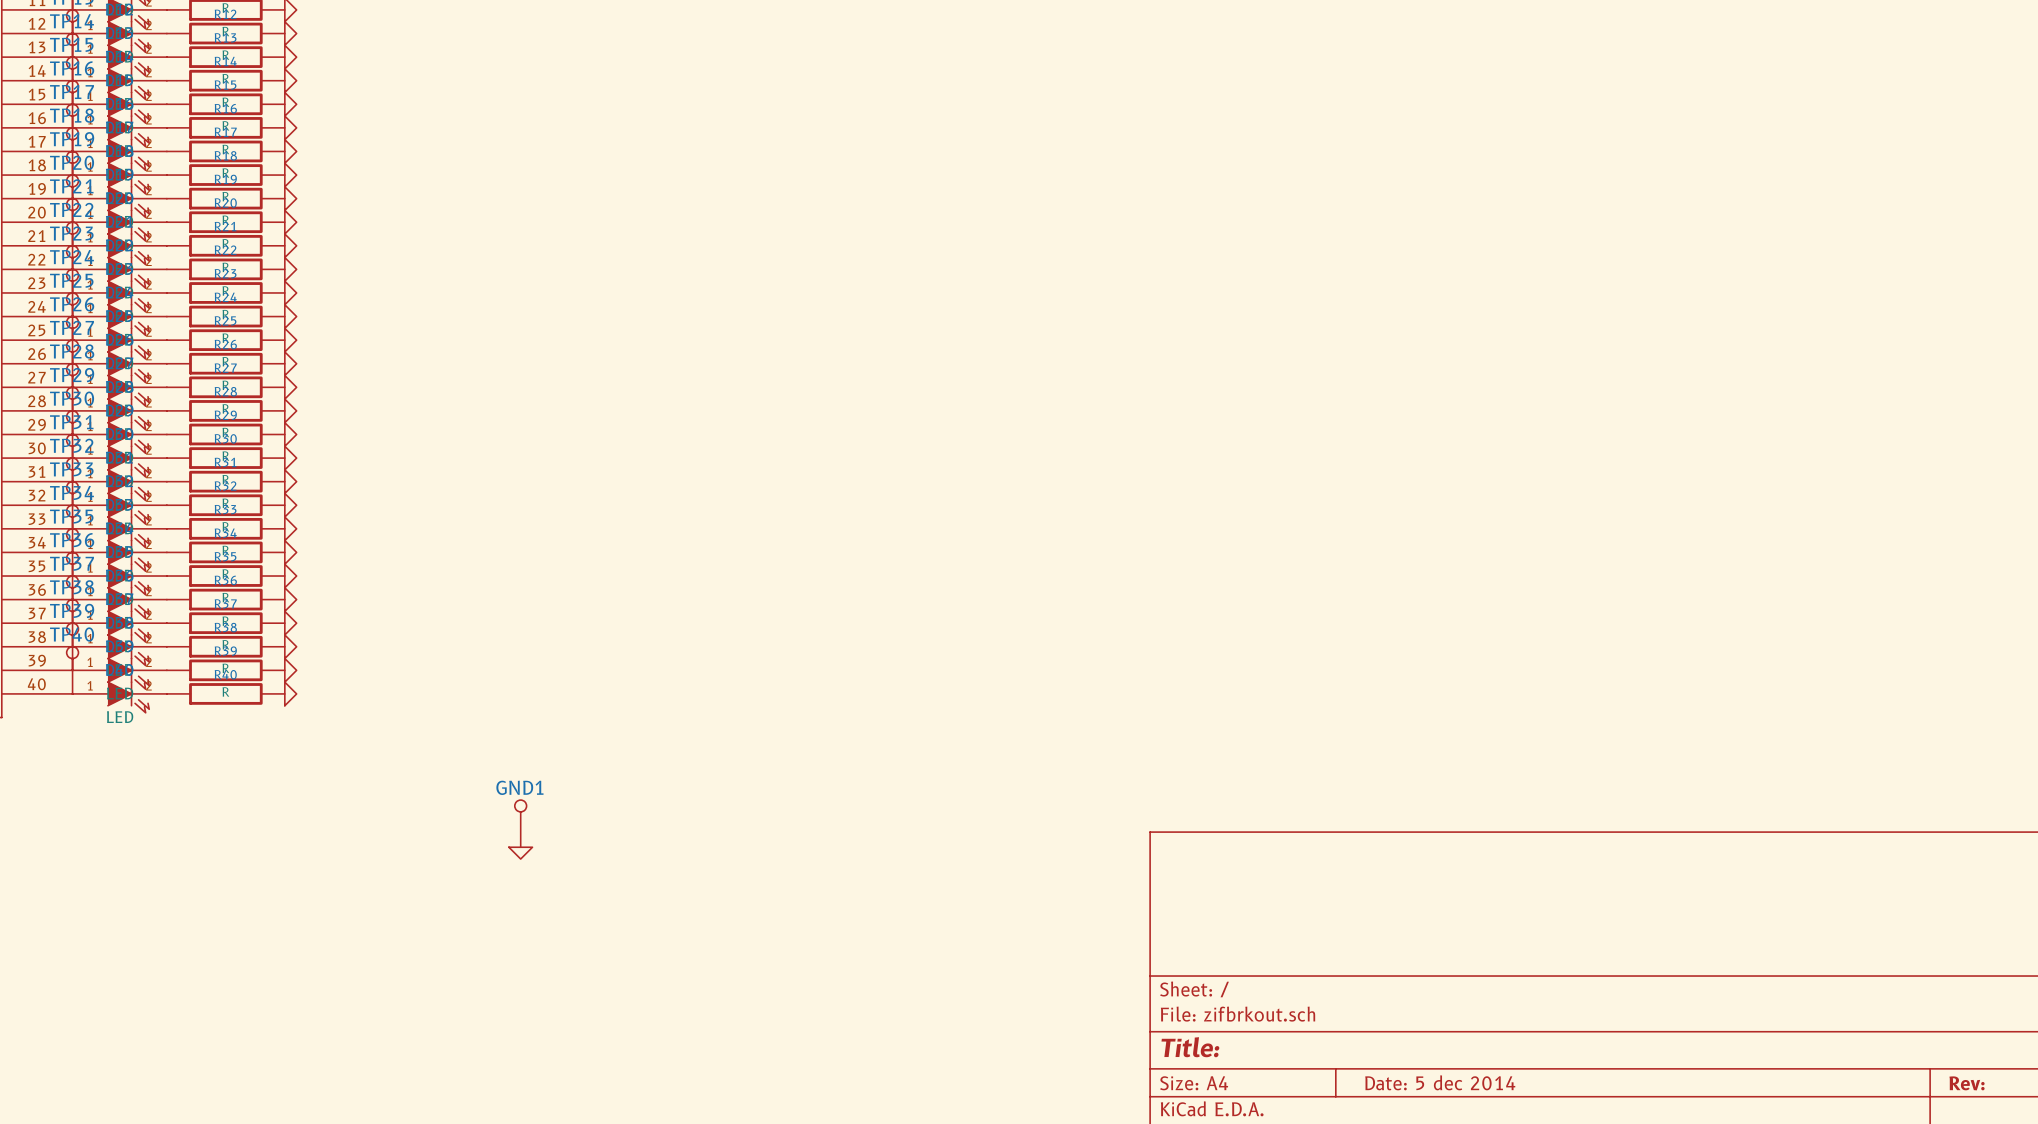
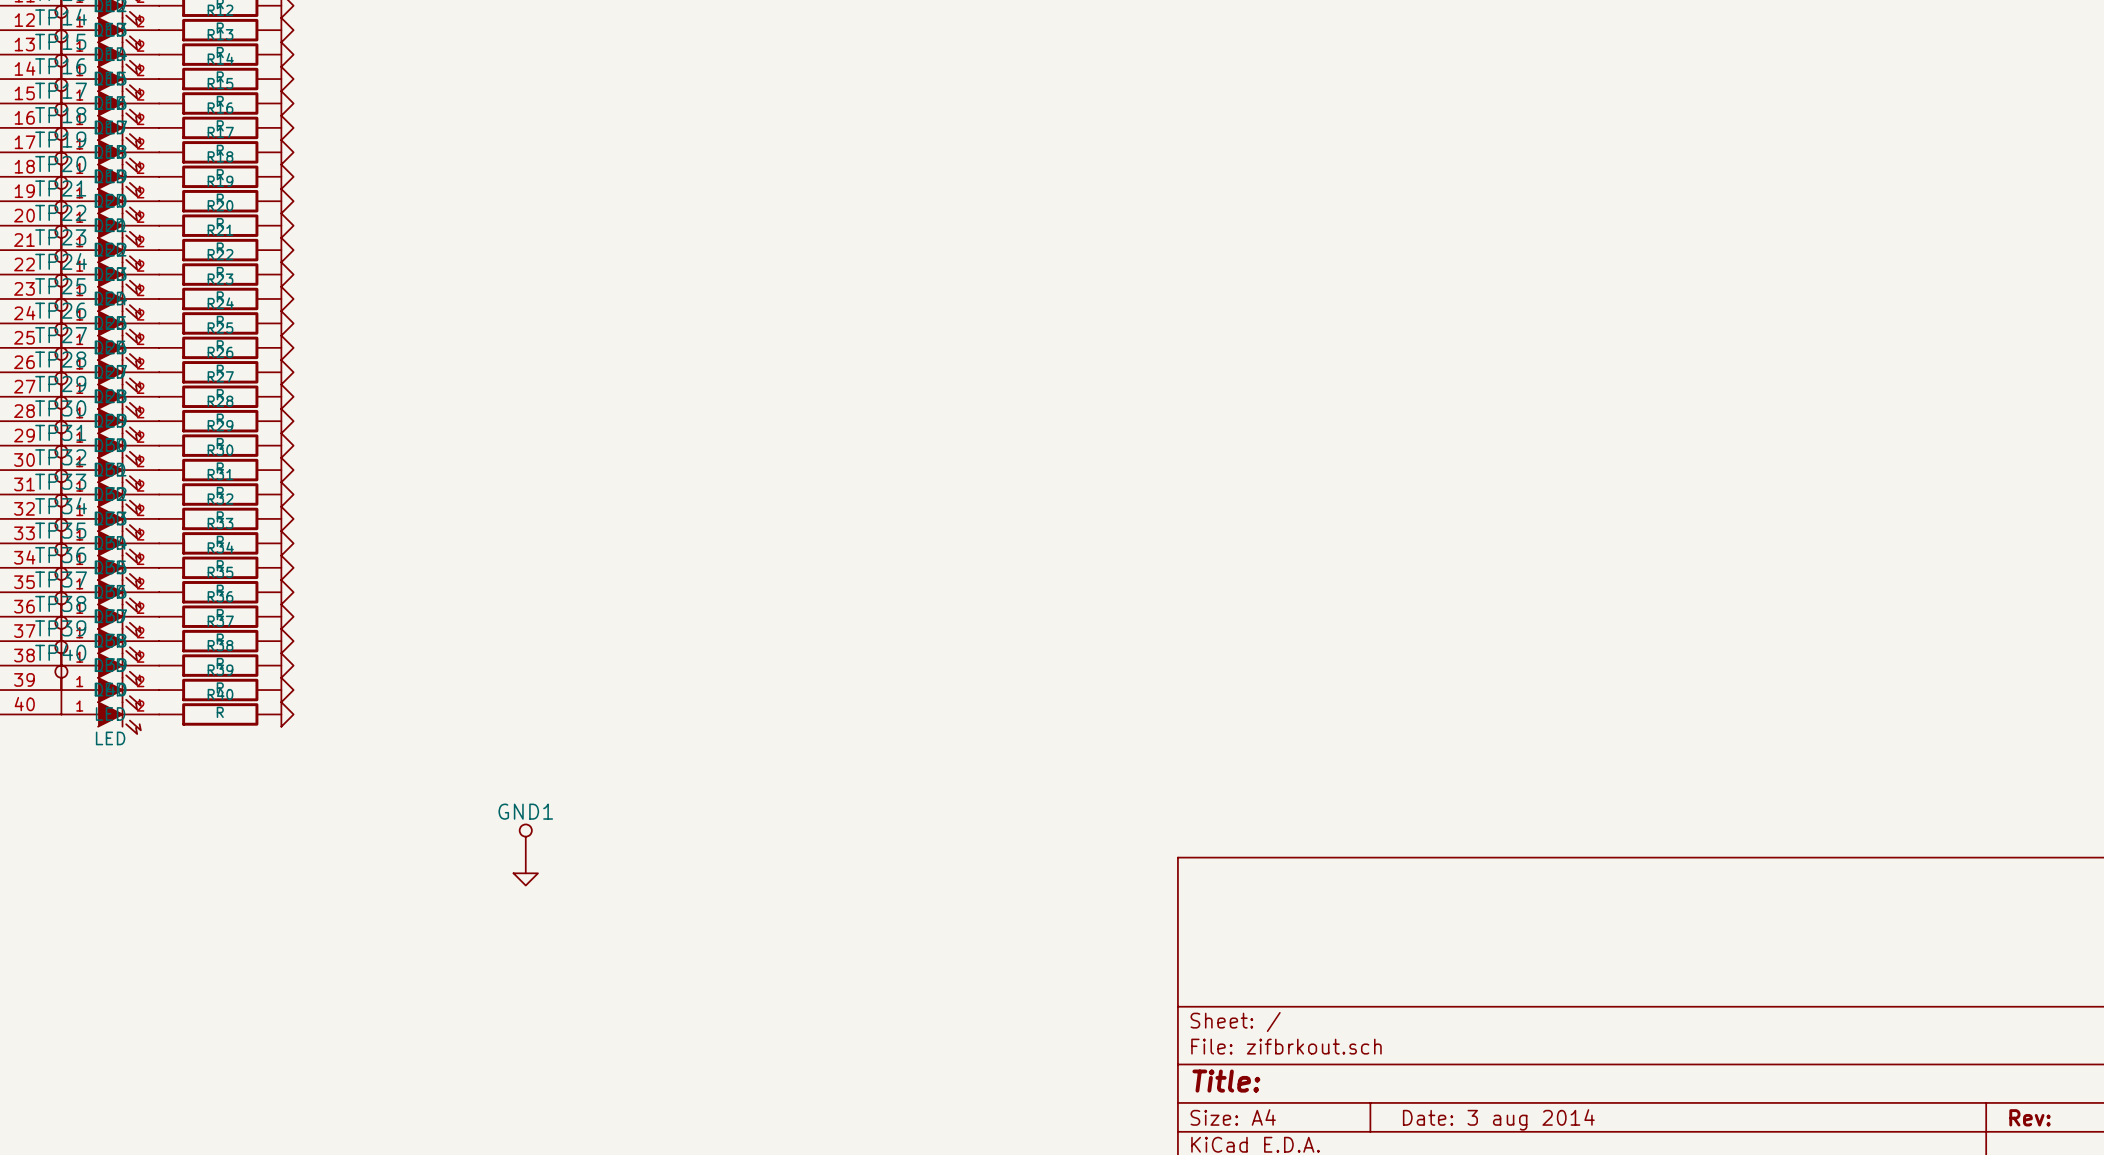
title block: Date: 5 dec 2014 (1440, 1082) -> Date: 3 aug 2014 (1498, 1119)

